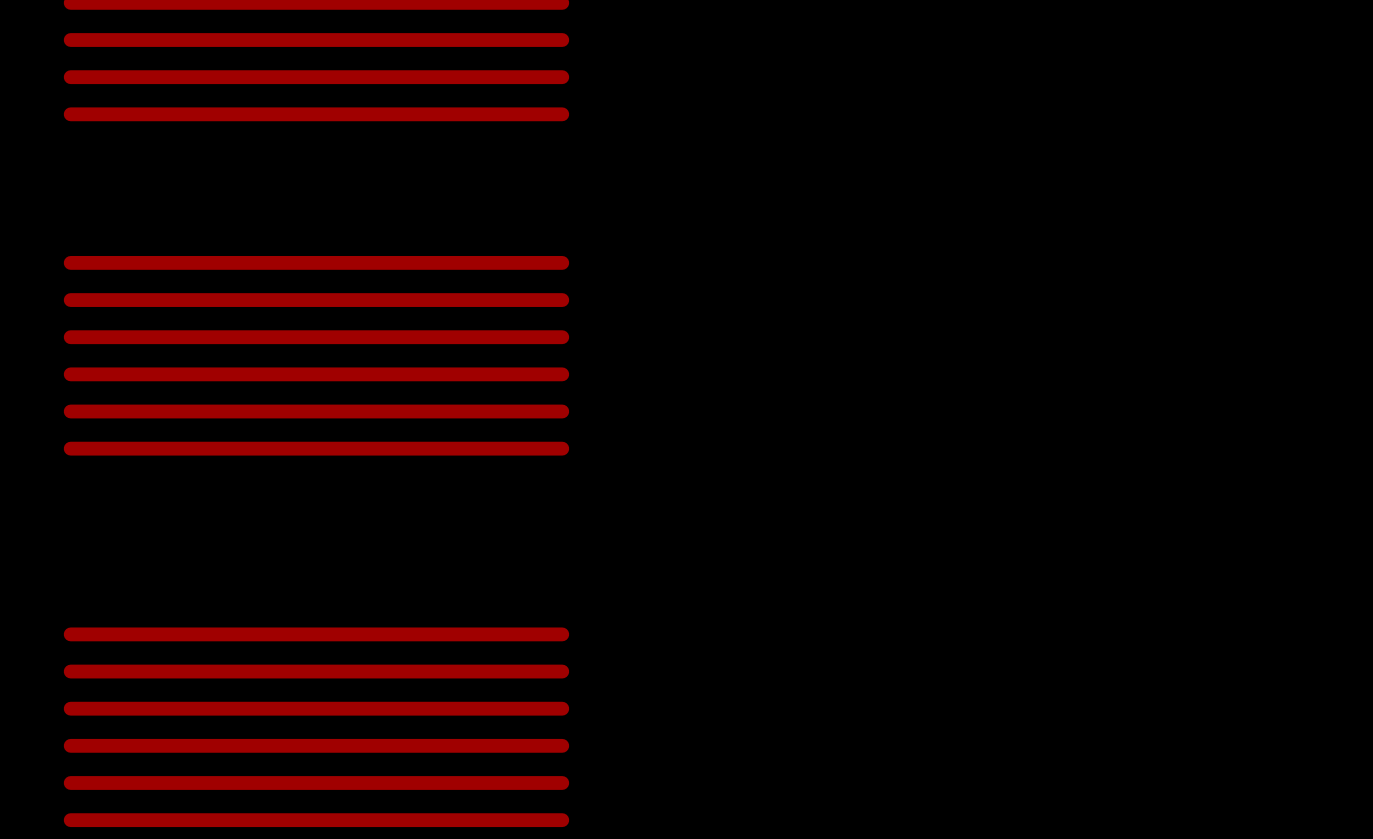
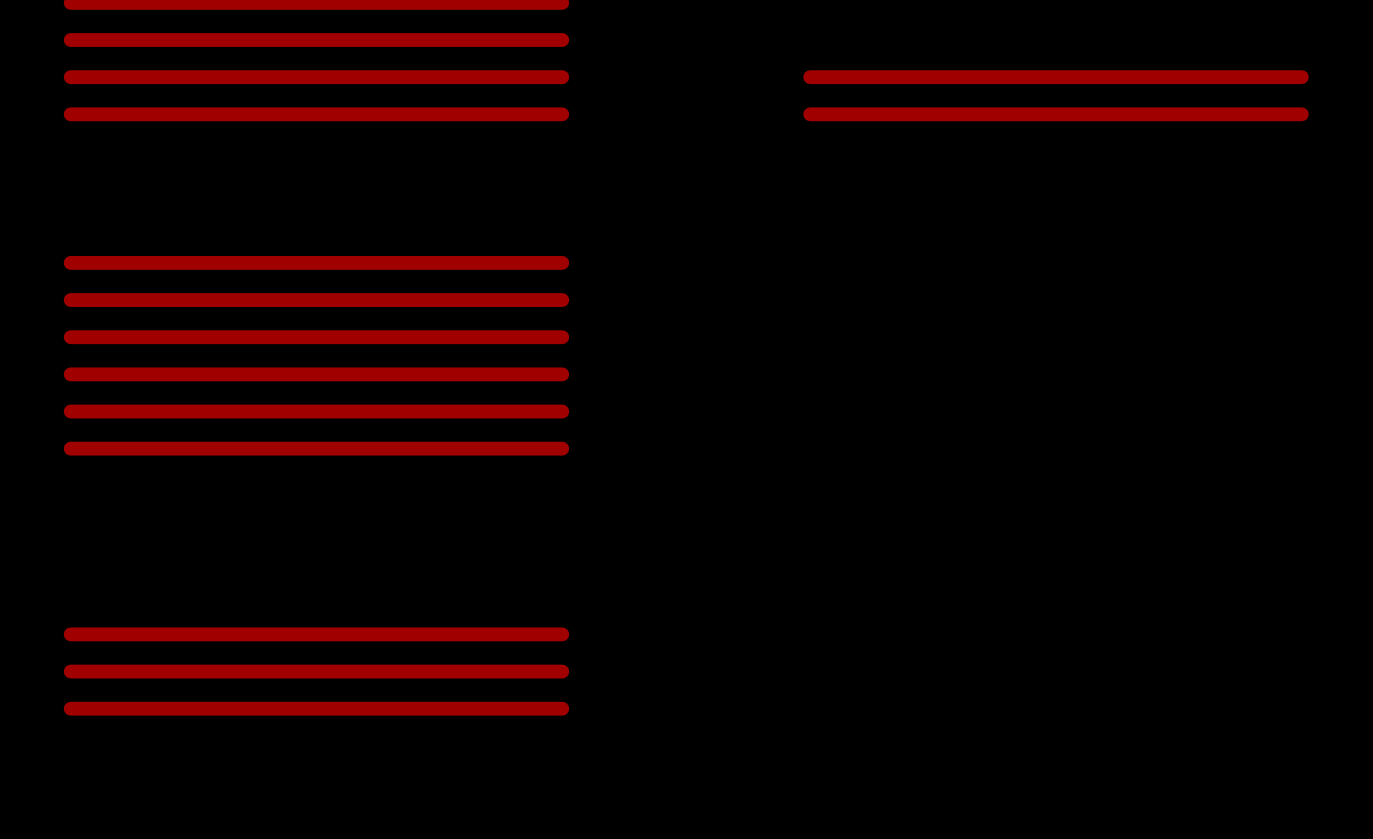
track: none -> (810, 77) (1301, 77)
track: none -> (810, 114) (1301, 114)
track: (70, 745) (562, 745) -> none
track: (70, 782) (562, 782) -> none
track: (70, 820) (562, 820) -> none

